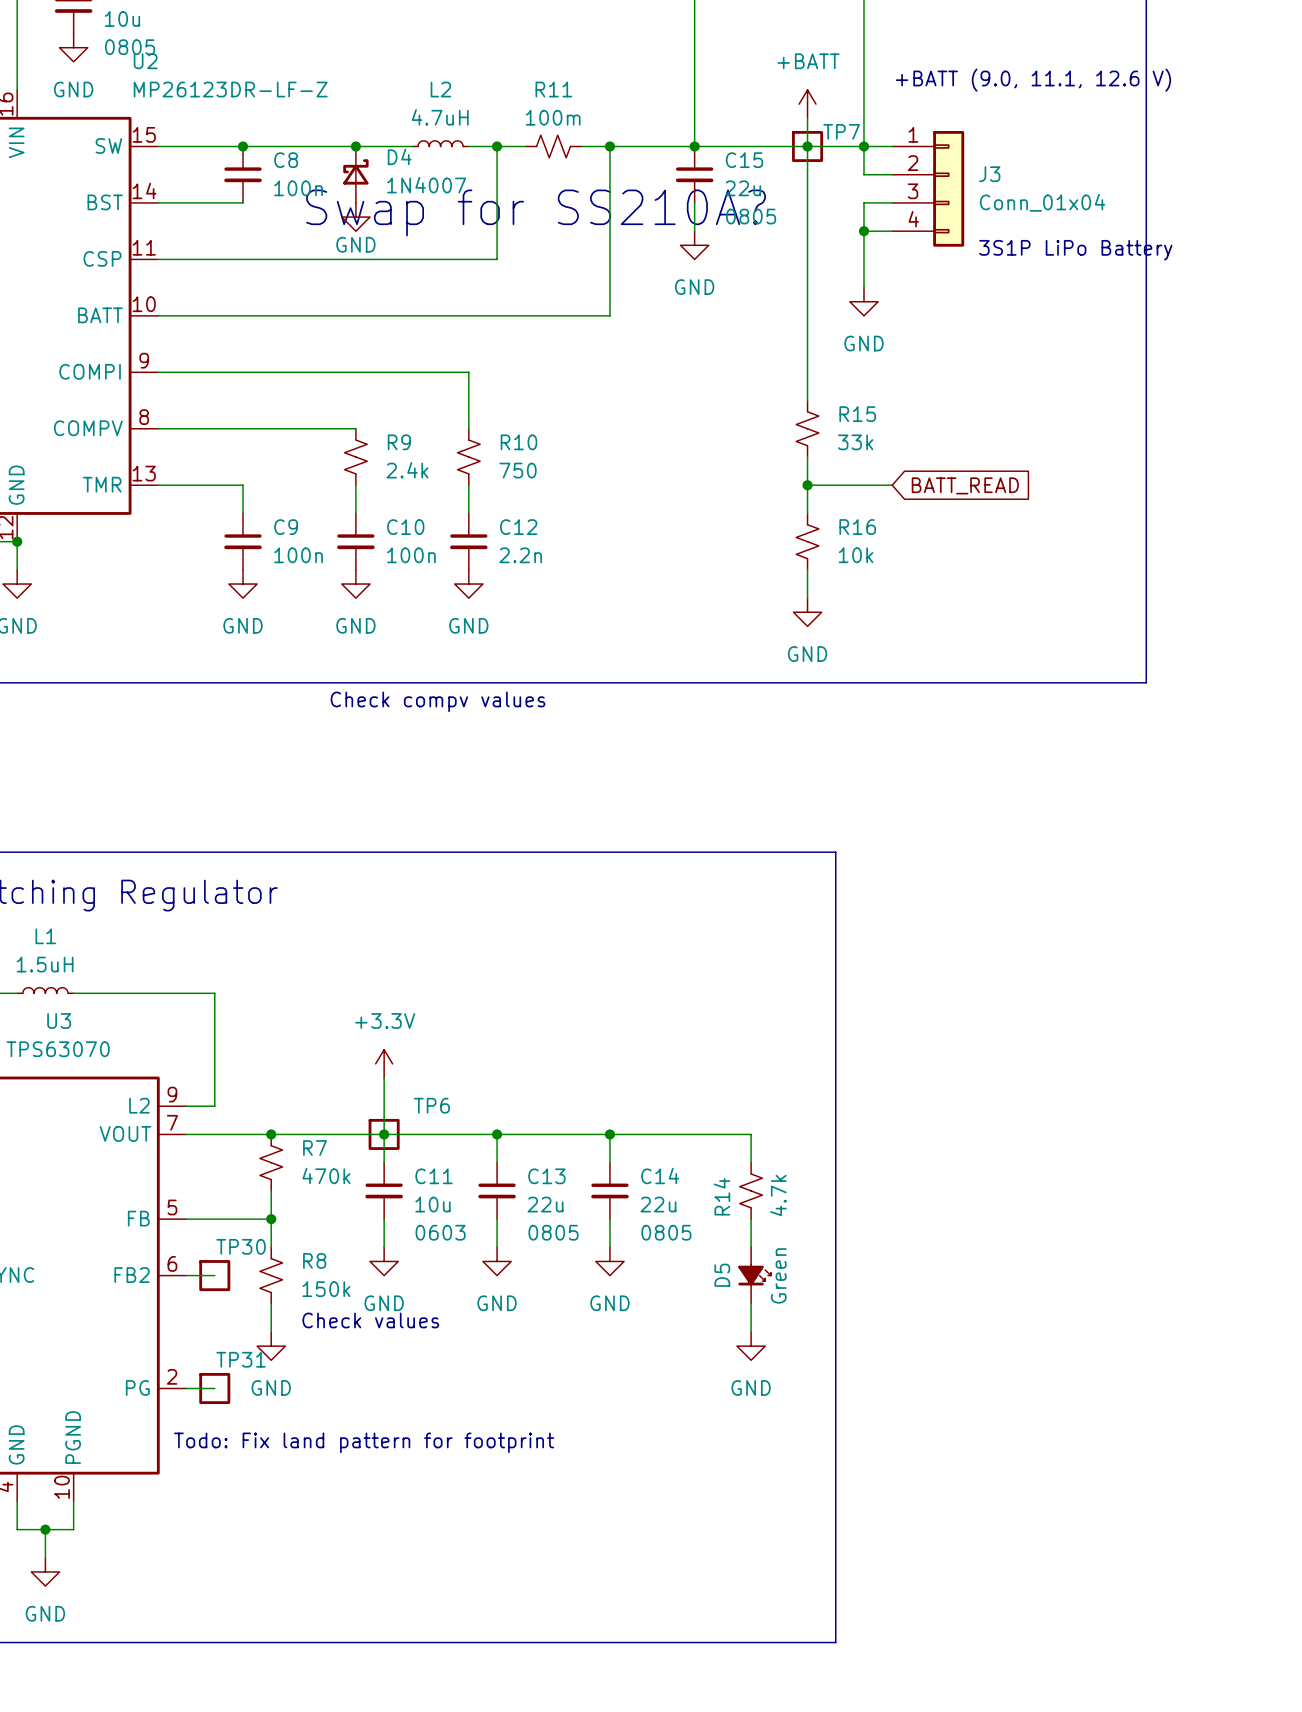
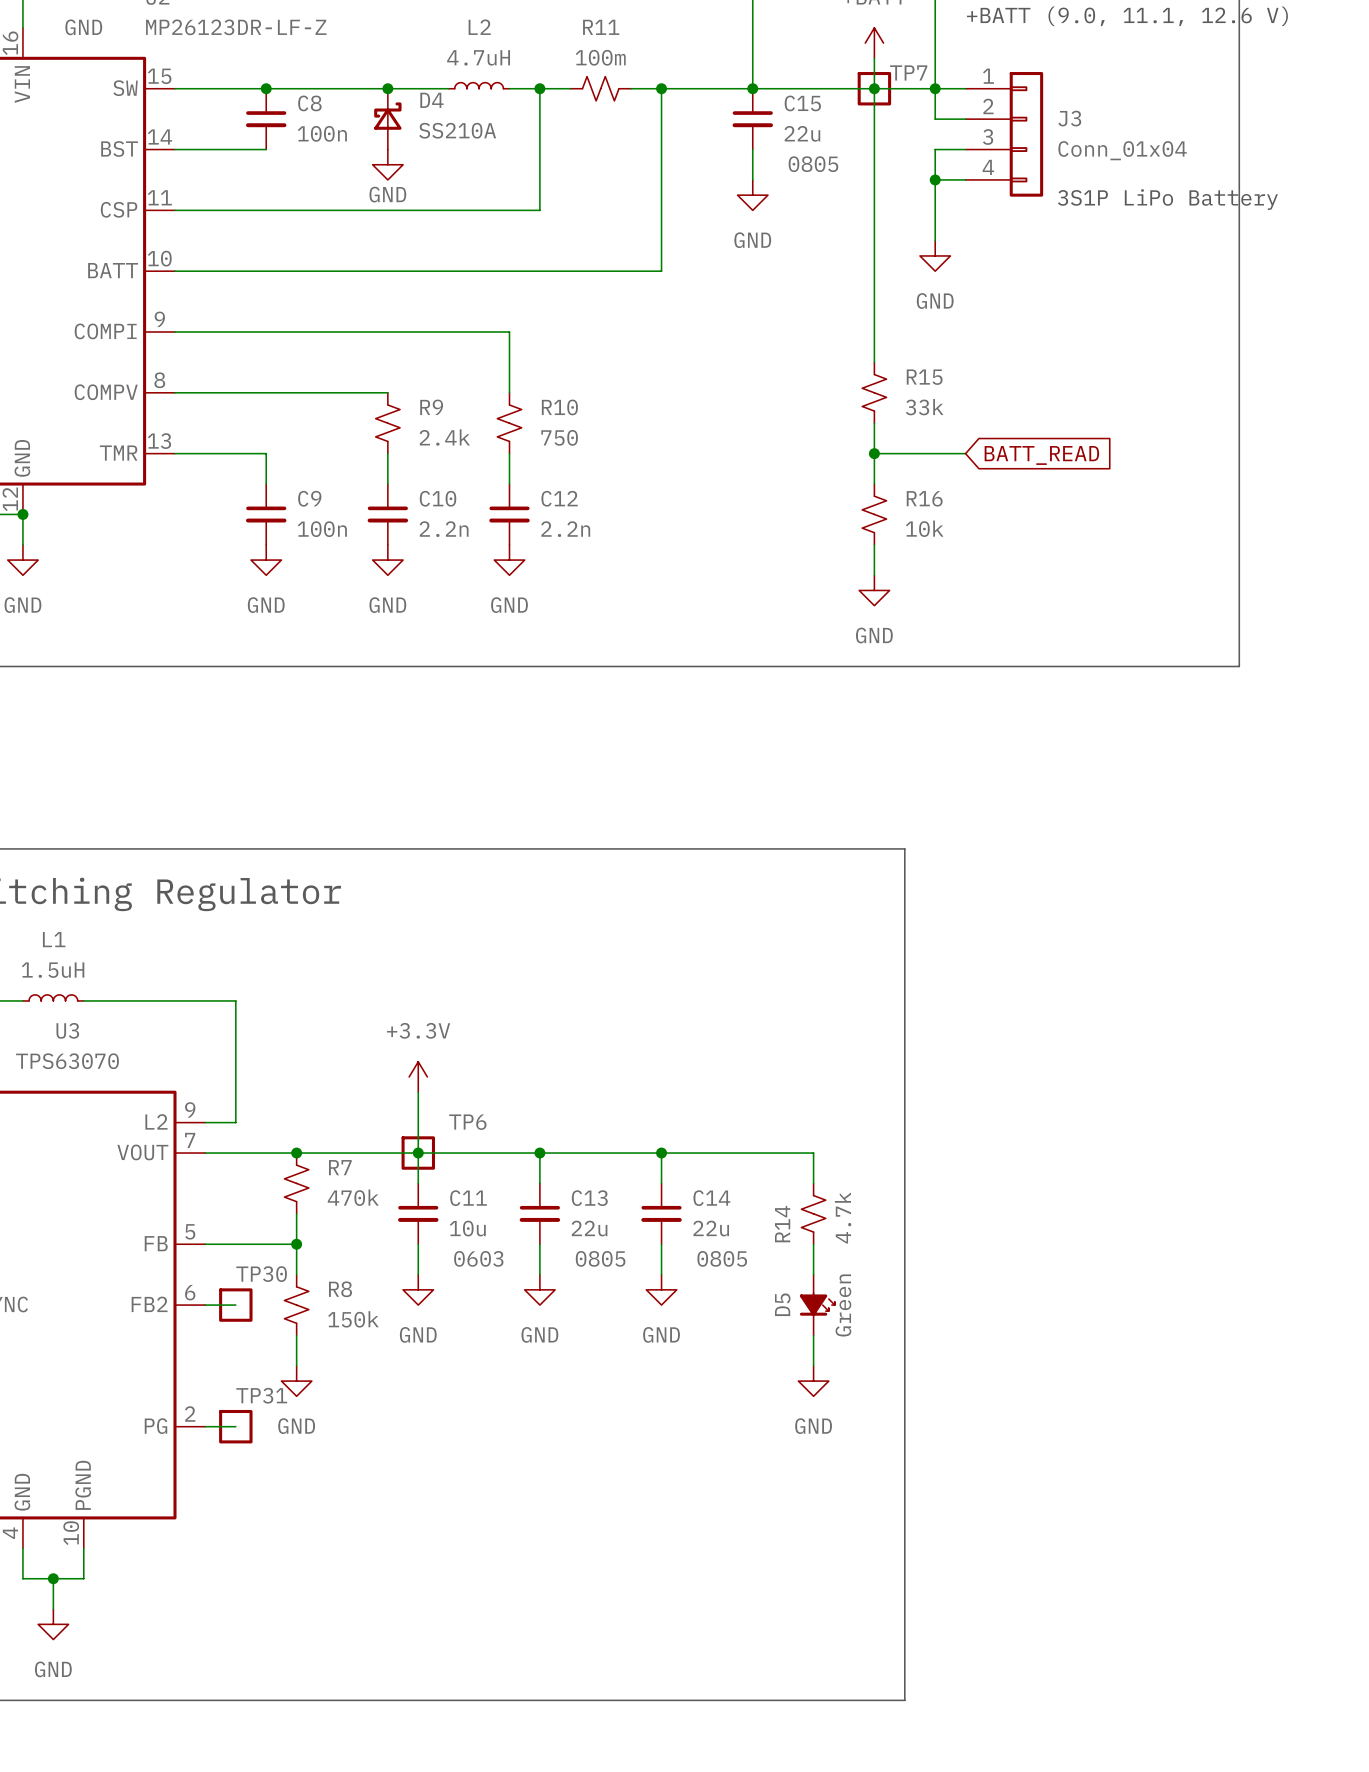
D4 value: 1N4007 (426, 185) -> SS210A (457, 130)
text: Swap for SS210A? (536, 212) -> none
C10 value: 100n (411, 555) -> 2.2n (444, 529)
text: Check compv values (438, 701) -> none
text: Check values (370, 1320) -> none
text: Todo: Fix land pattern for footprint (364, 1442) -> none

